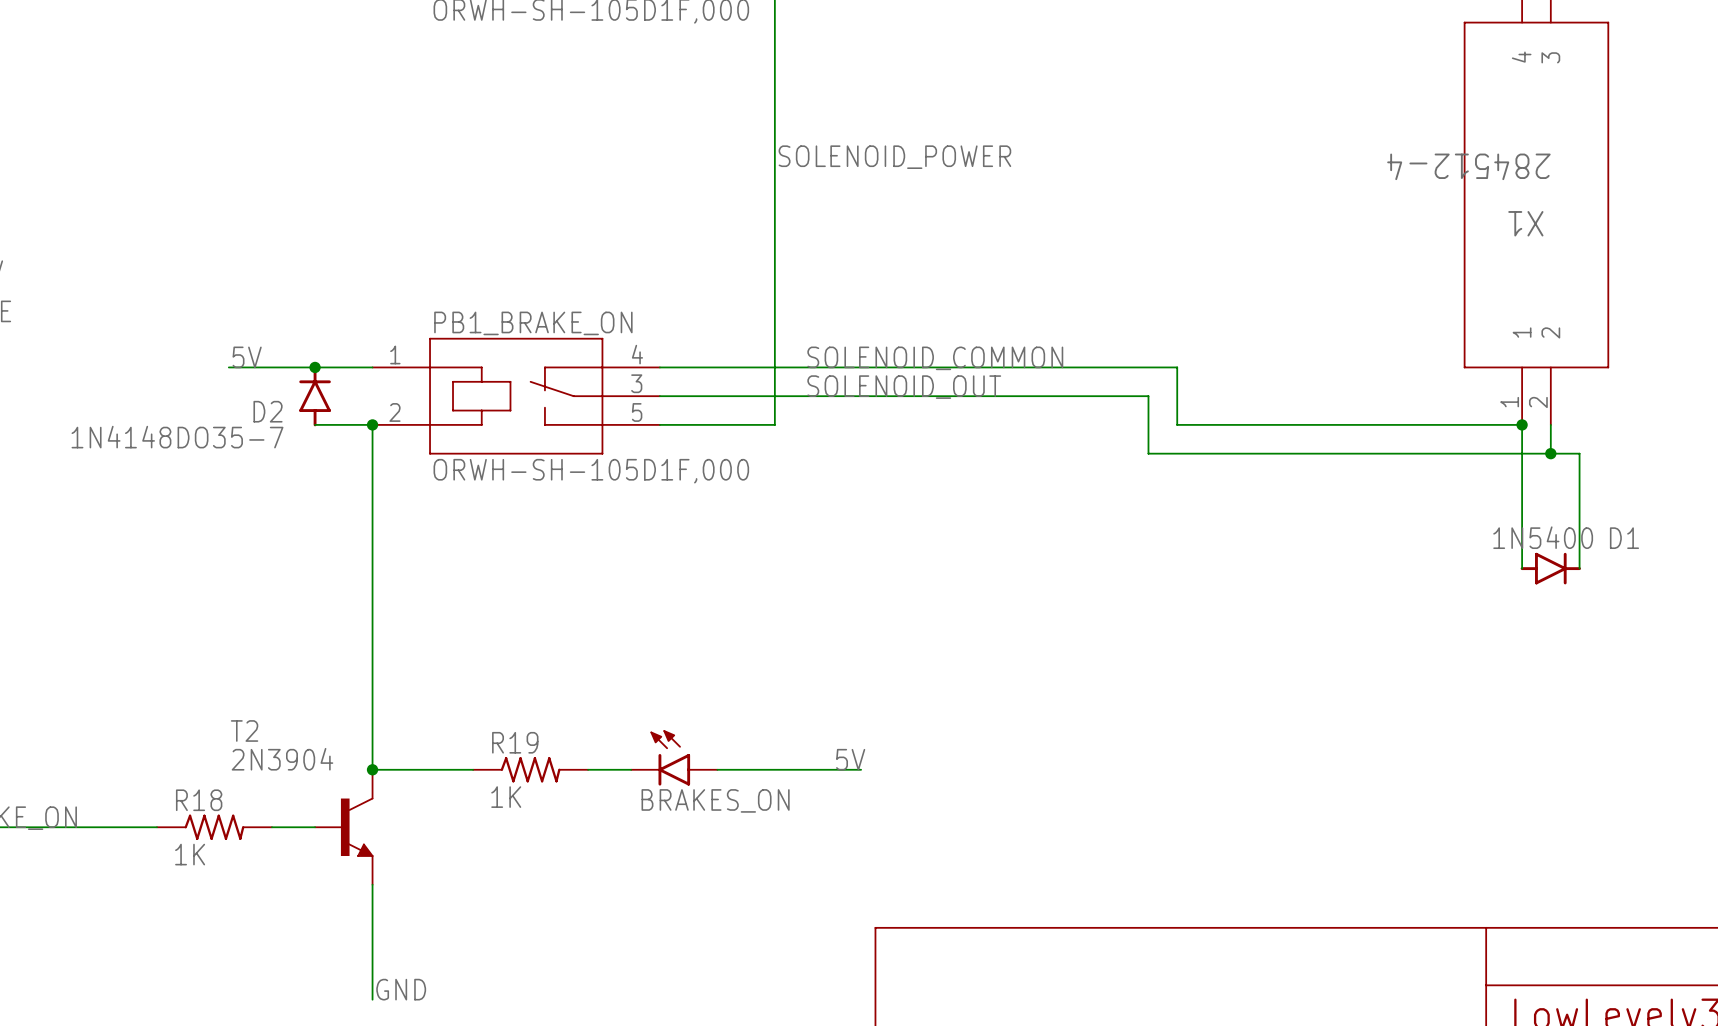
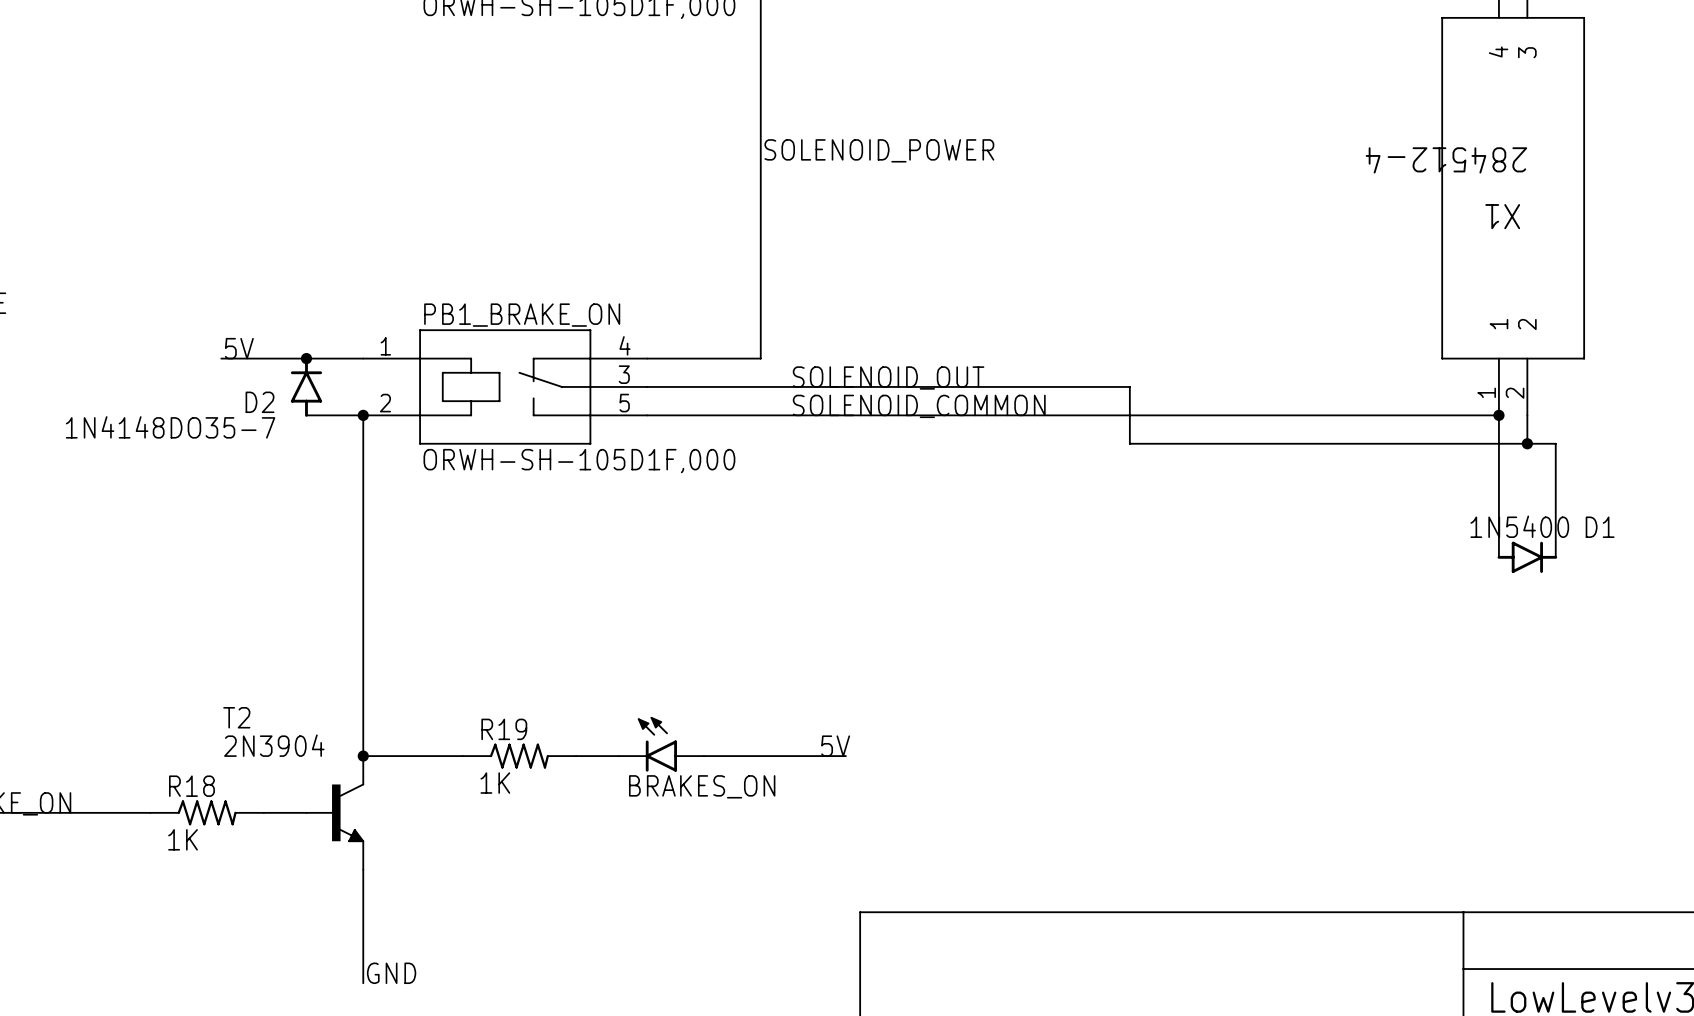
label position: SOLENOID_COMMON (935, 358) -> SOLENOID_COMMON (919, 406)
wire: (774, 424) (774, 367) (1177, 367) (1177, 424) -> (760, 415) (1158, 415)

